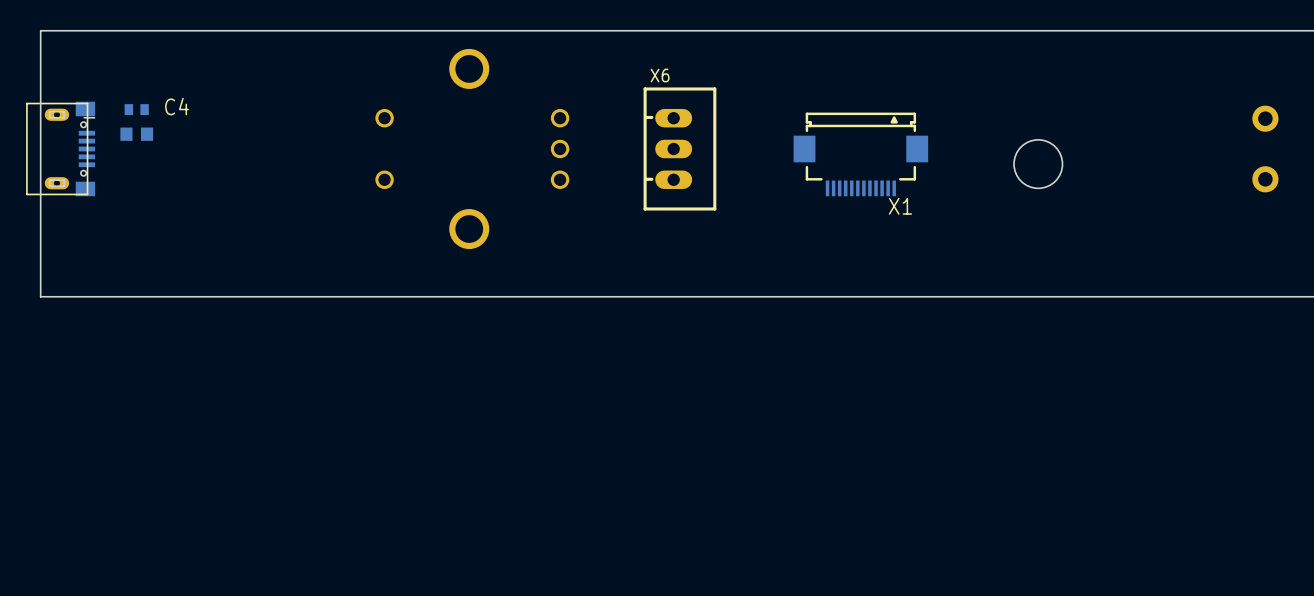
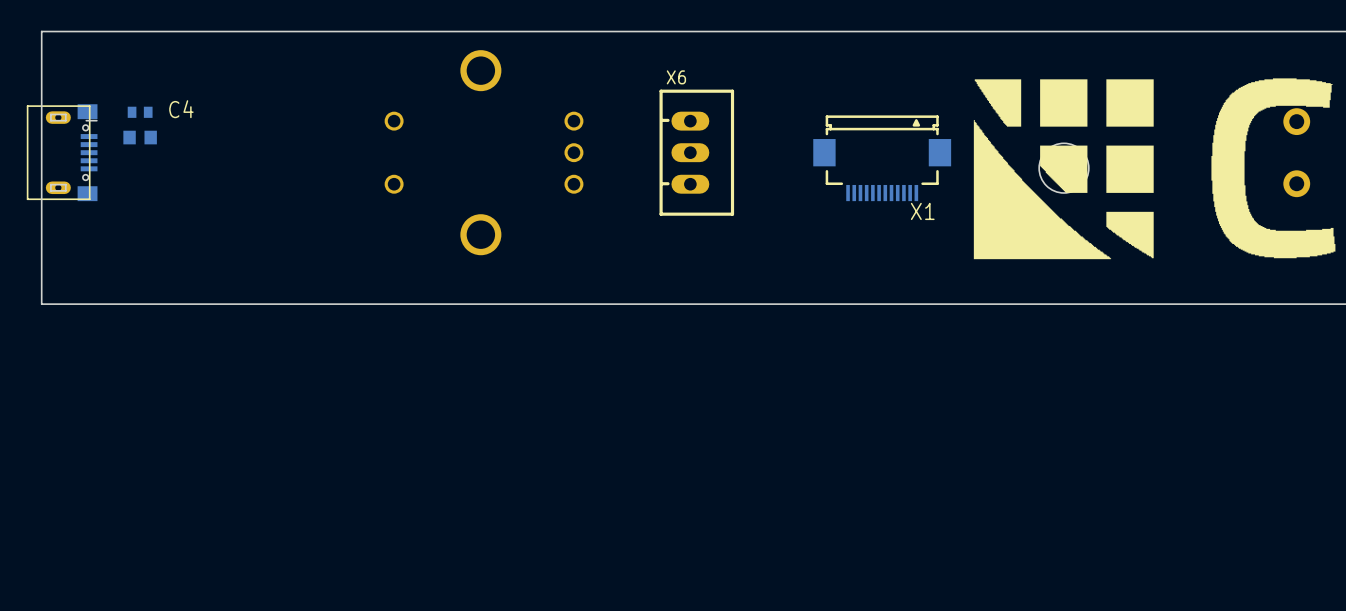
drawing: none -> [1211, 78, 1336, 259]
drawing: none -> [974, 79, 1022, 127]
drawing: none -> [1040, 79, 1088, 127]
drawing: none -> [1106, 79, 1154, 127]
drawing: none -> [973, 120, 1112, 260]
drawing: none -> [1040, 145, 1088, 193]
drawing: none -> [1106, 145, 1154, 193]
drawing: none -> [1106, 211, 1154, 259]

